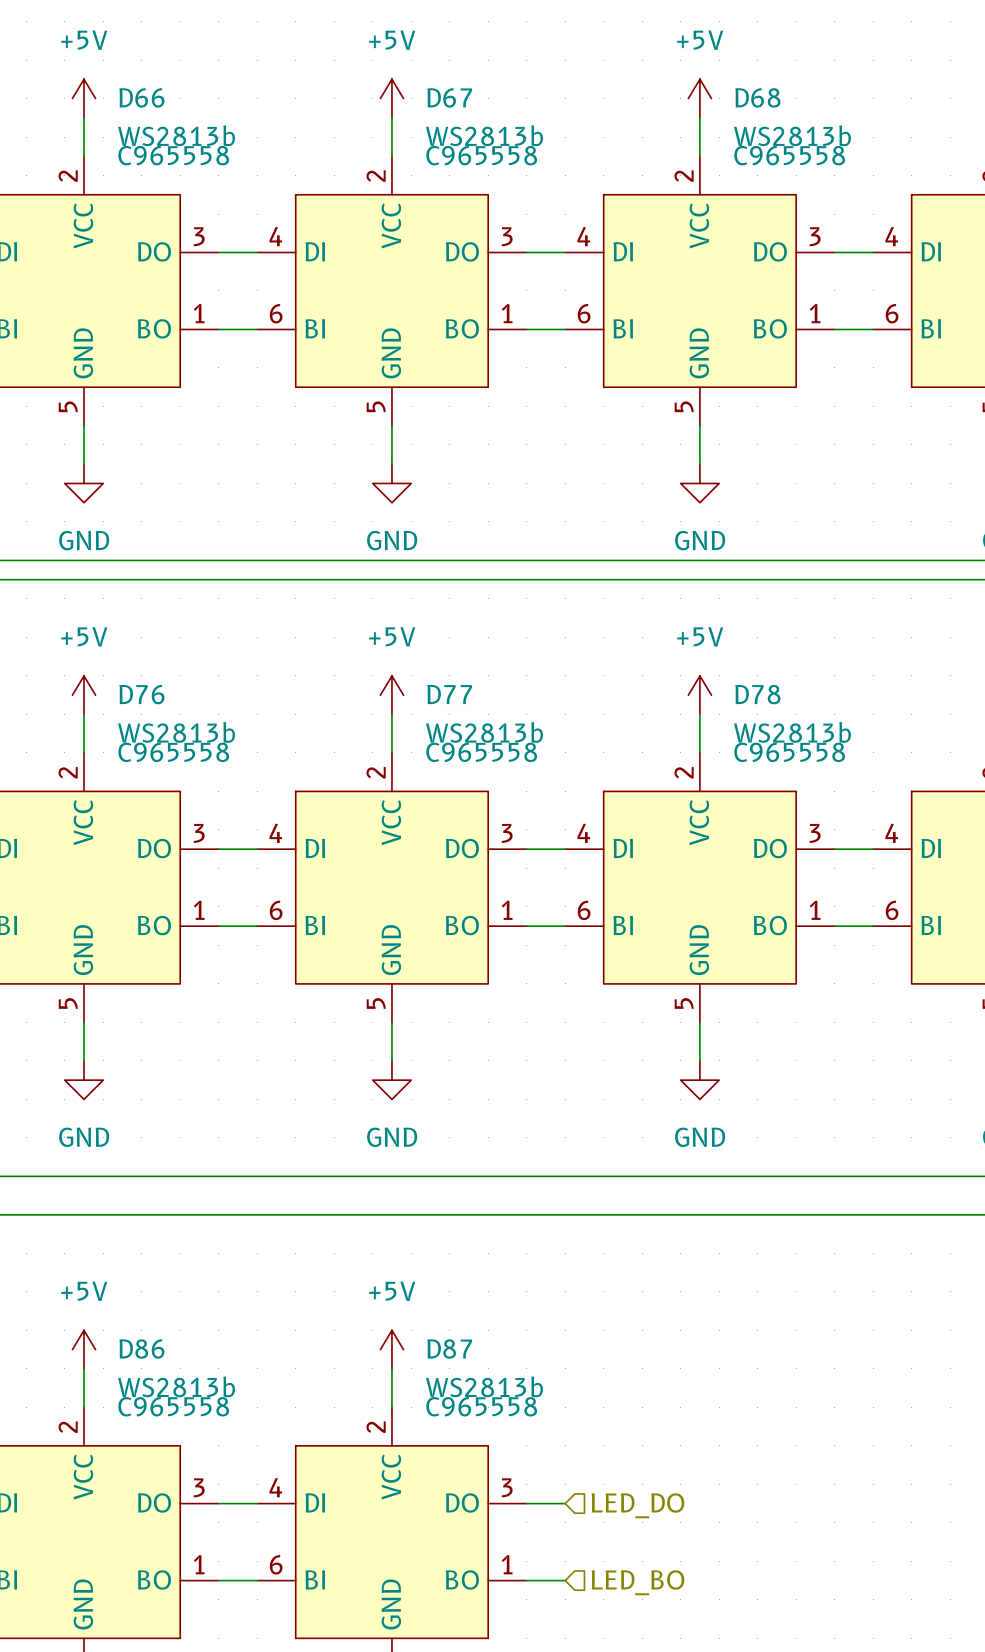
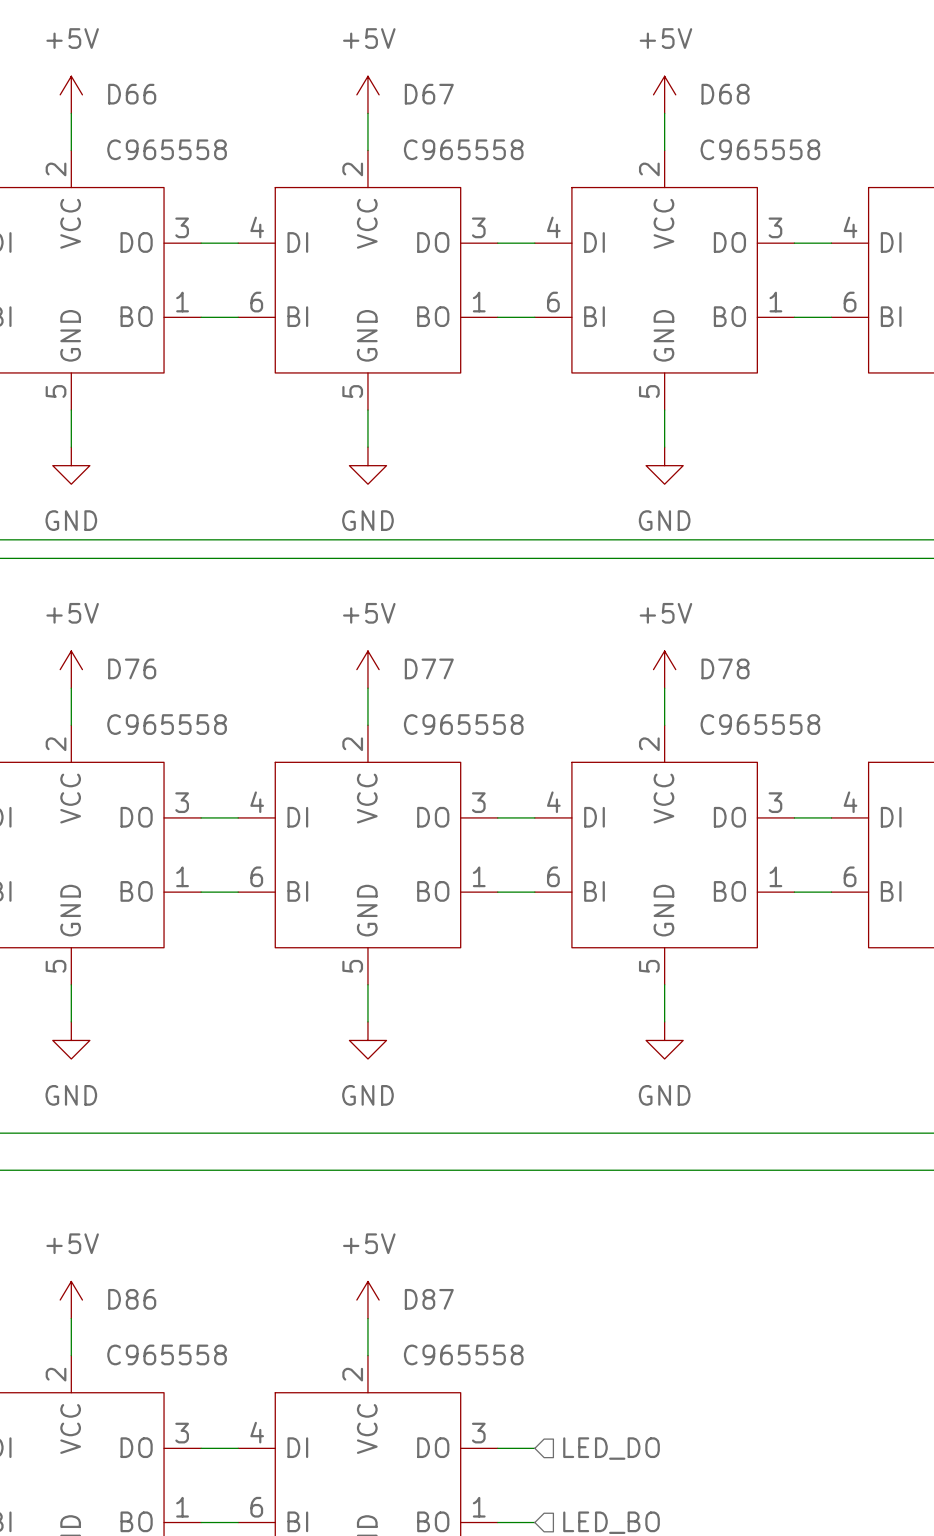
D66 value: WS2813b (176, 135) -> none
D67 value: WS2813b (484, 135) -> none
D68 value: WS2813b (792, 135) -> none
D76 value: WS2813b (176, 732) -> none
D77 value: WS2813b (484, 732) -> none
D78 value: WS2813b (792, 732) -> none
D86 value: WS2813b (176, 1386) -> none
D87 value: WS2813b (484, 1386) -> none

